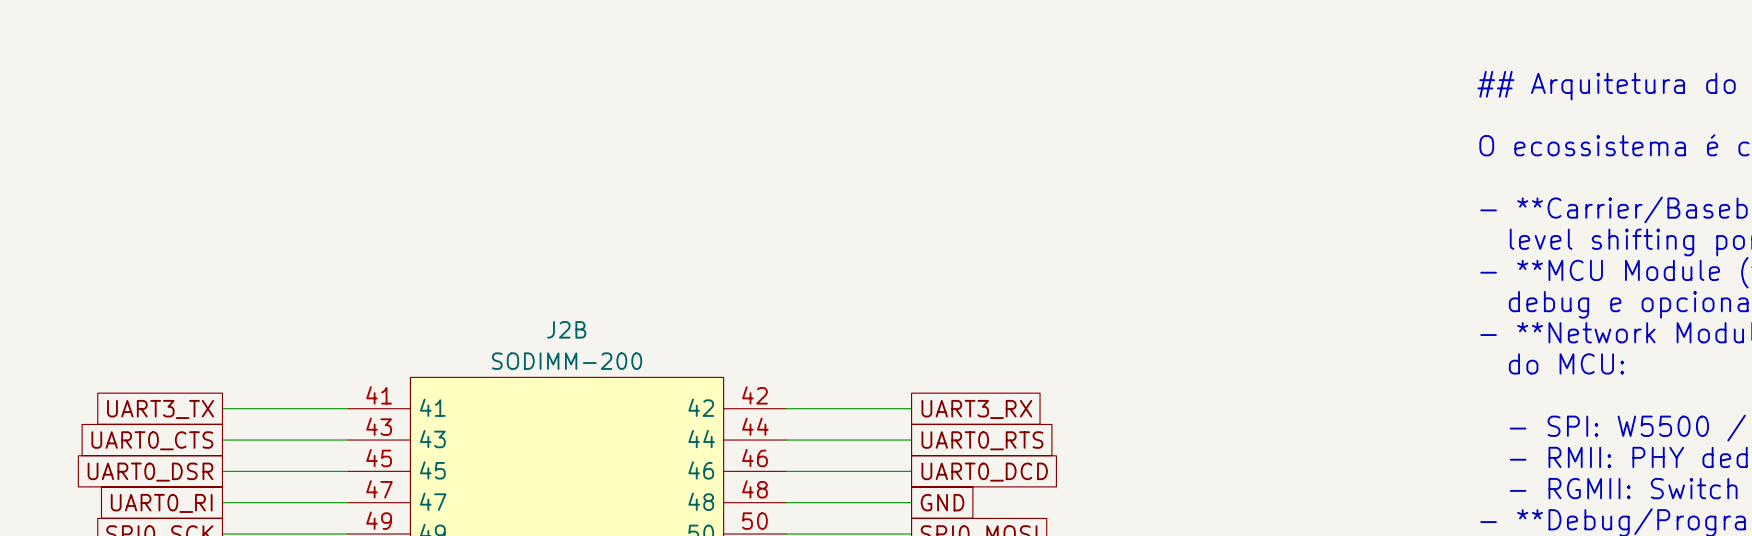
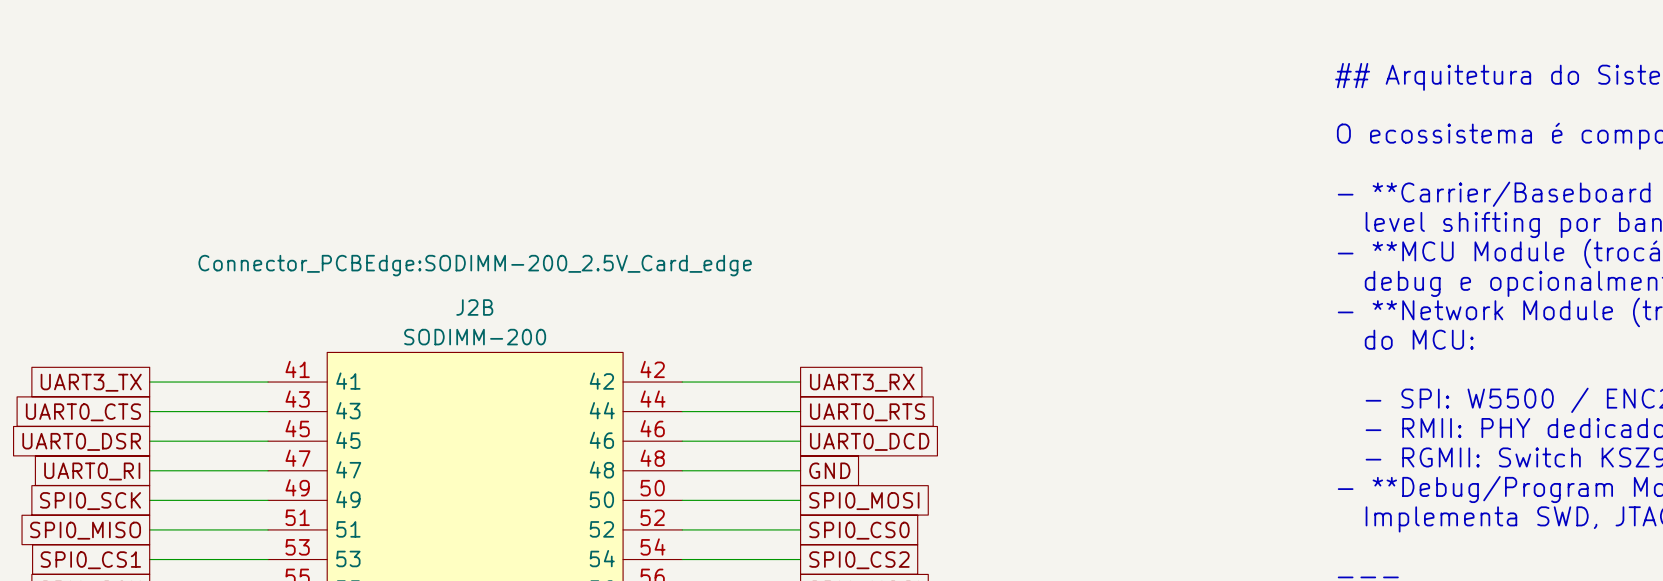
J2B text: none -> Connector_PCBEdge:SODIMM-200_2.5V_Card_edge (475, 265)

